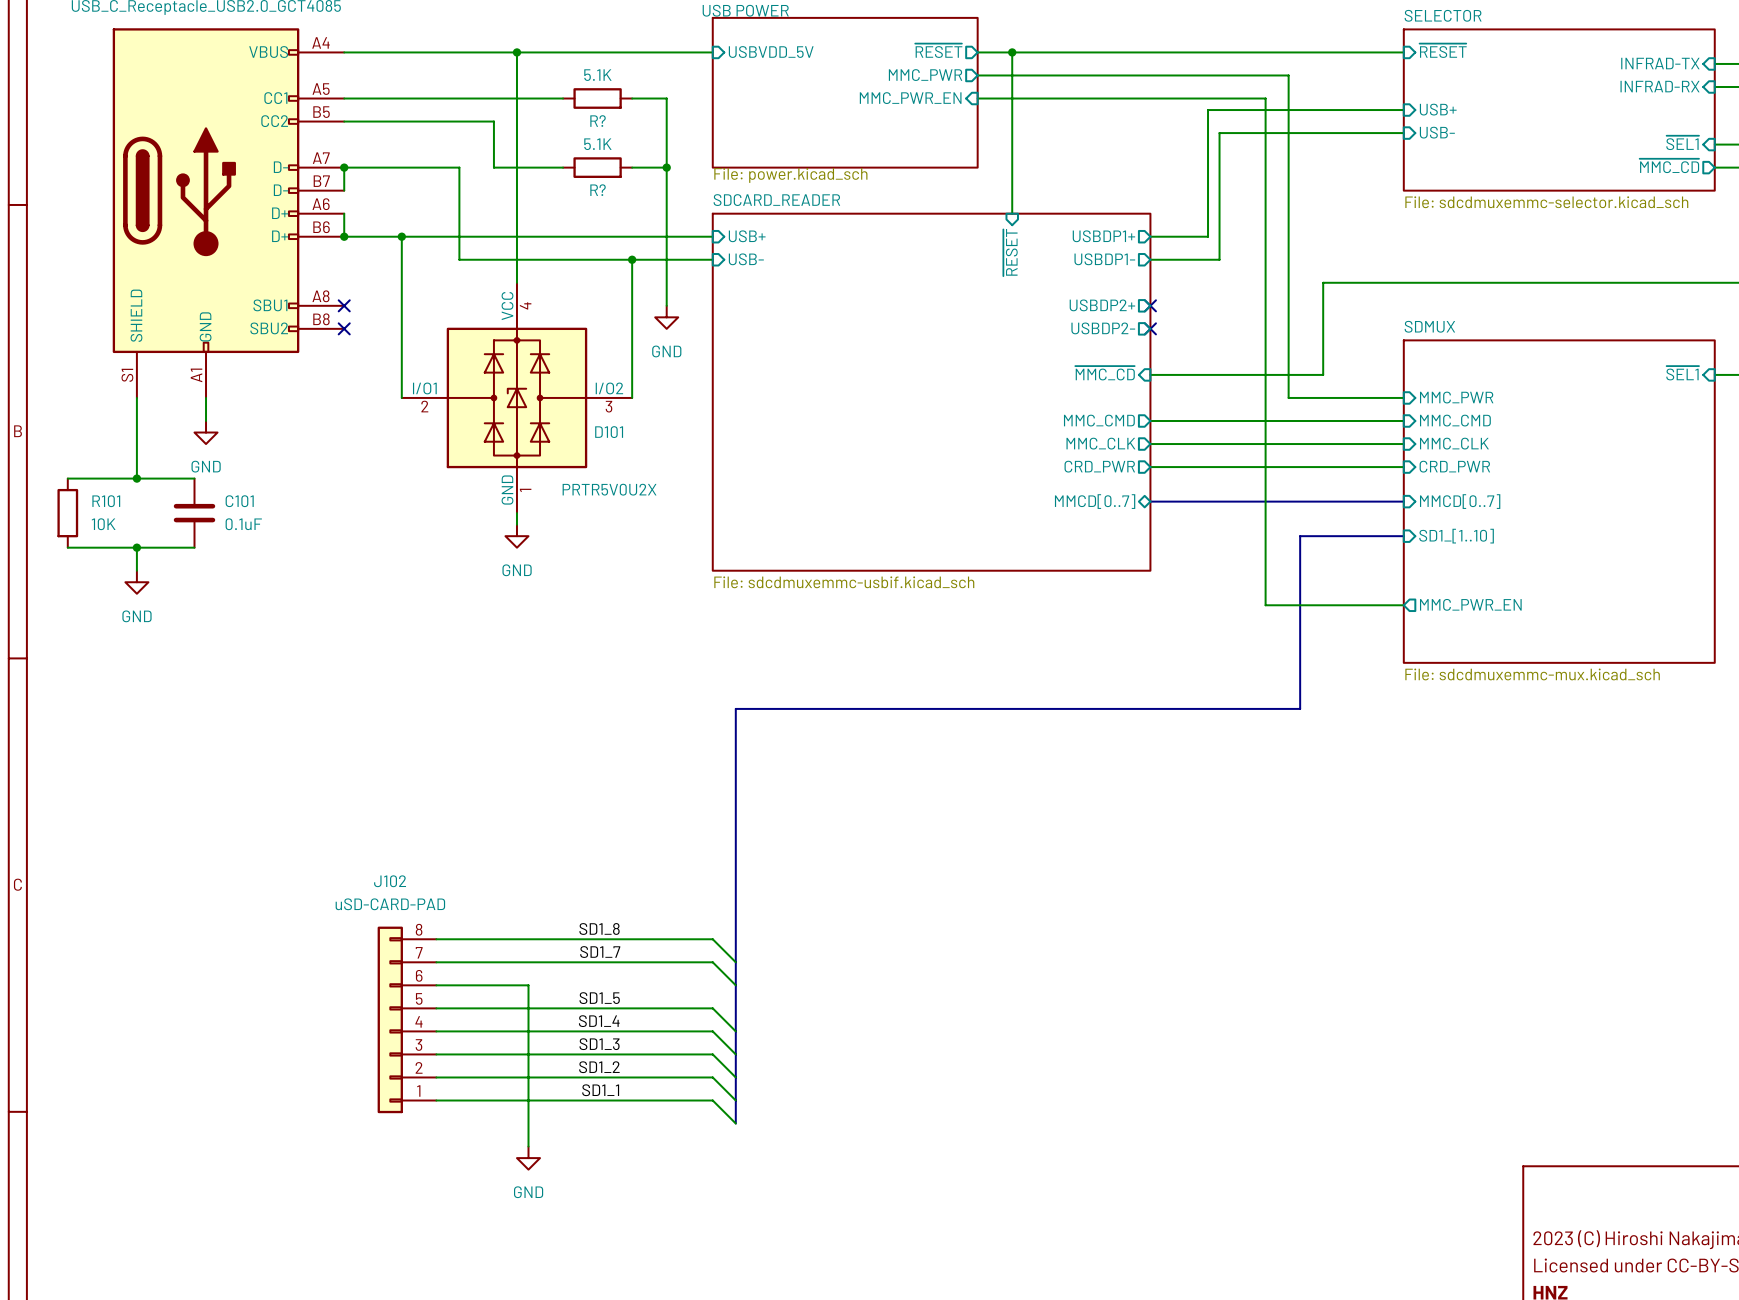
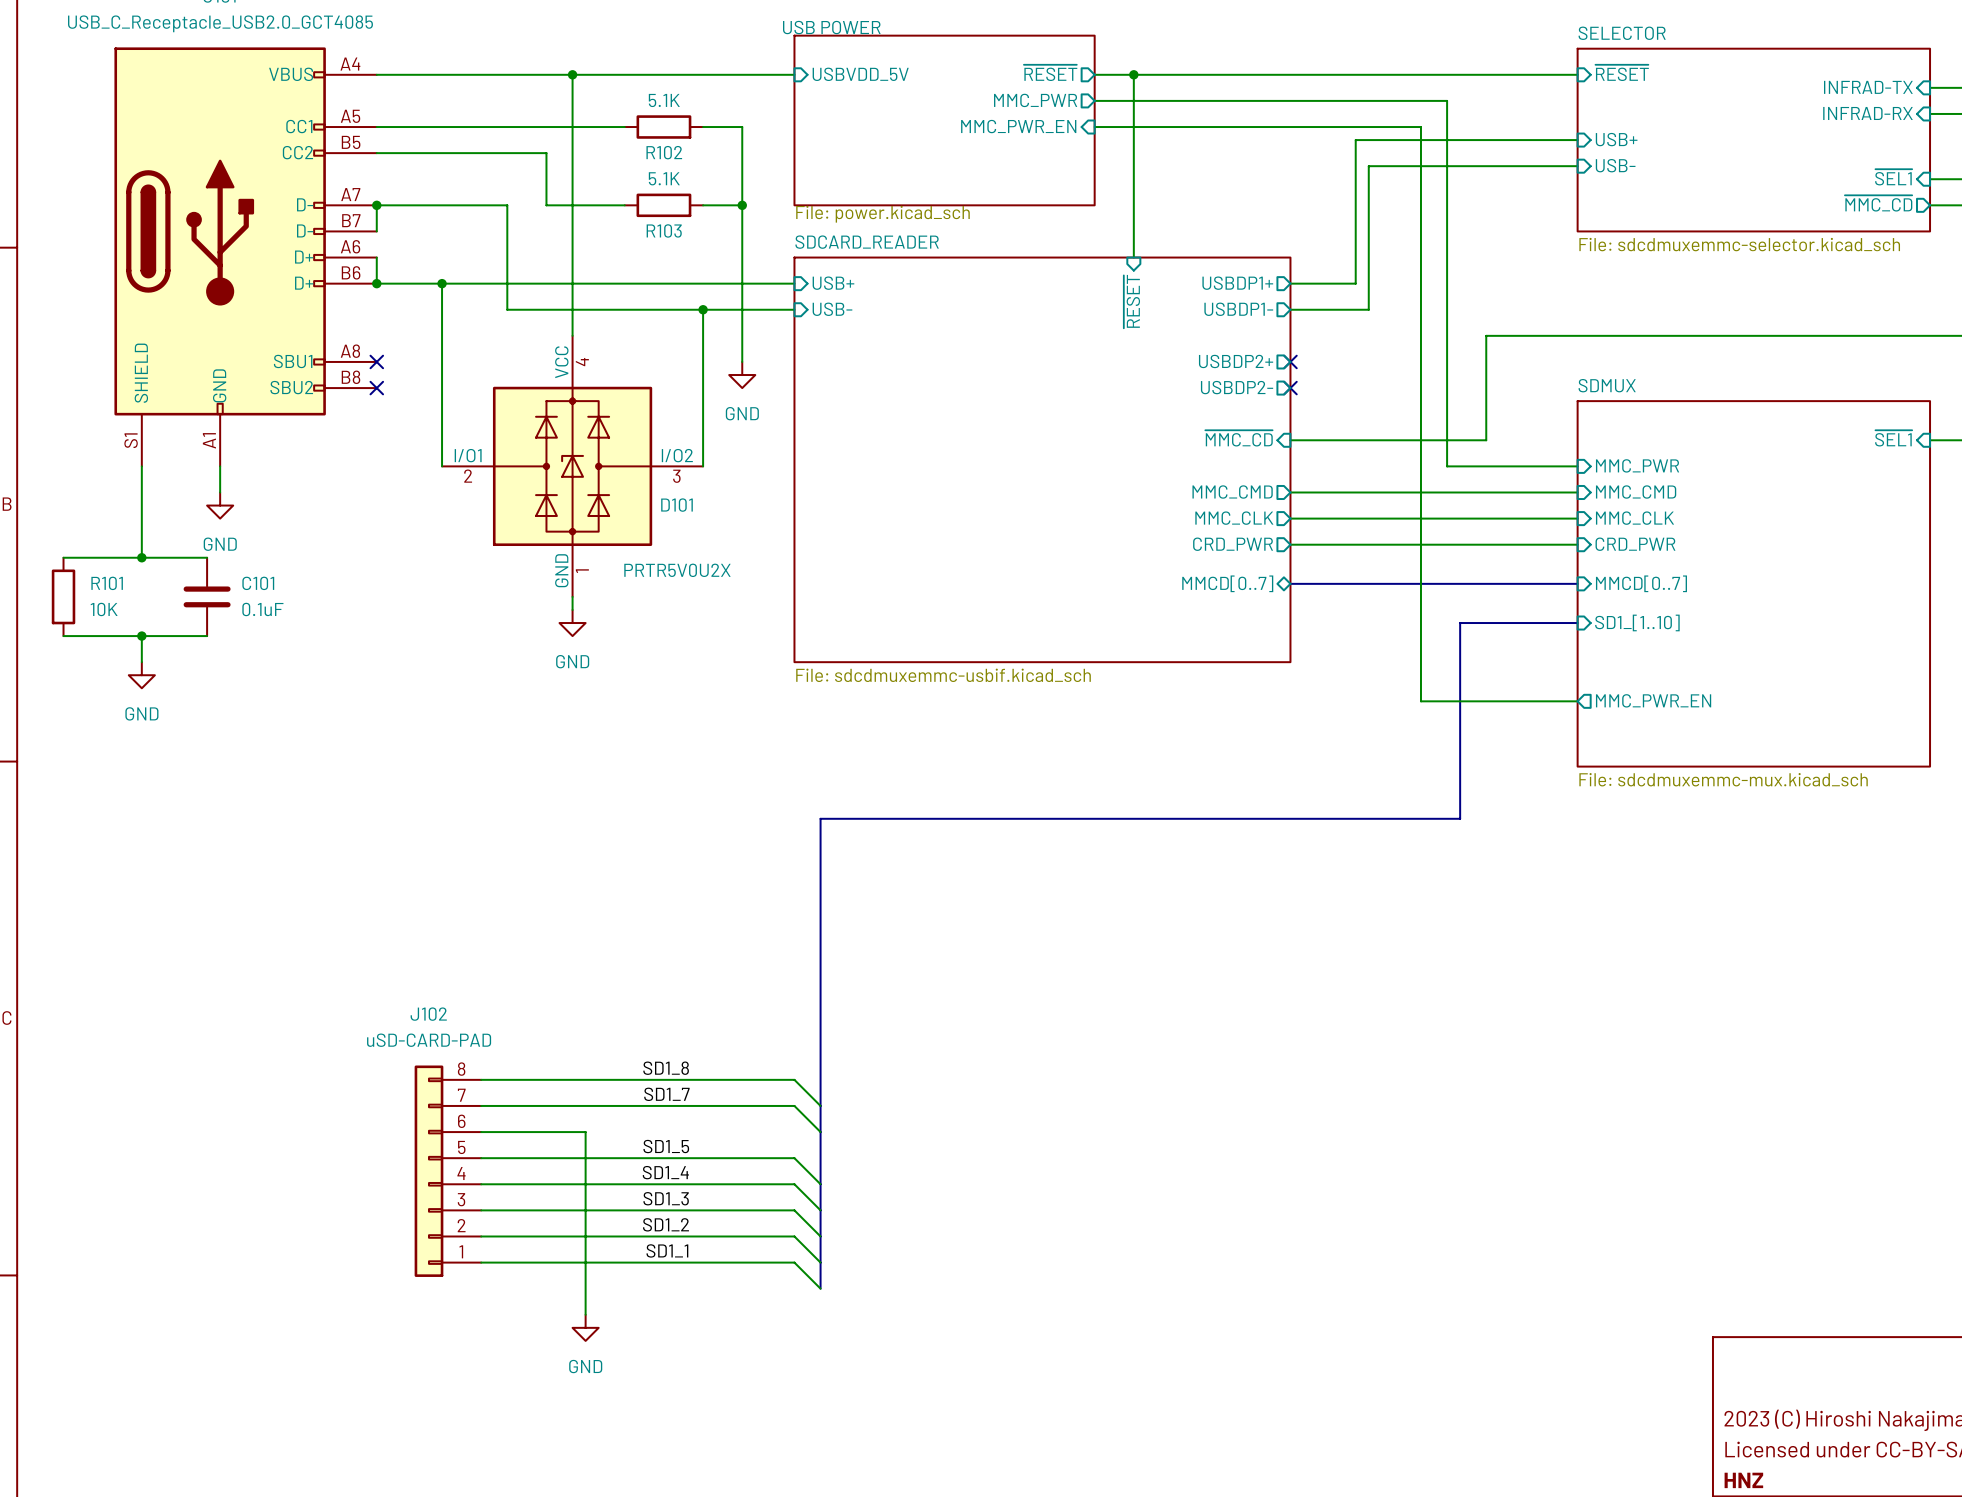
R? name: R? (598, 121) -> R102 (664, 152)
R? name: R? (598, 190) -> R103 (664, 230)

